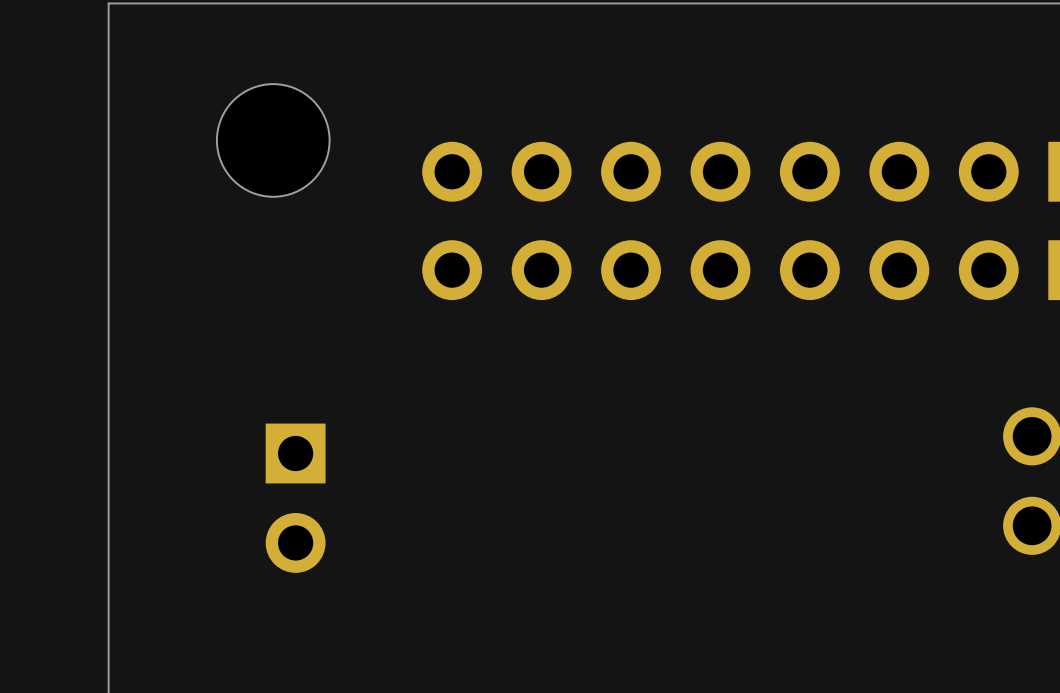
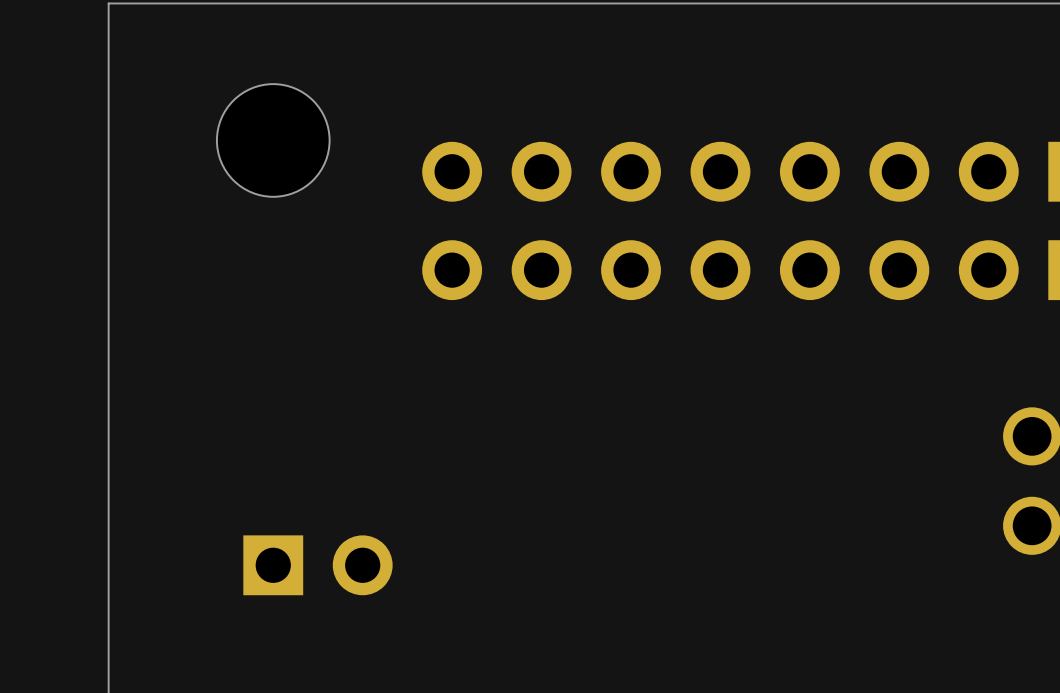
part rotation: 0° (295, 498) -> 90° counterclockwise (317, 565)

